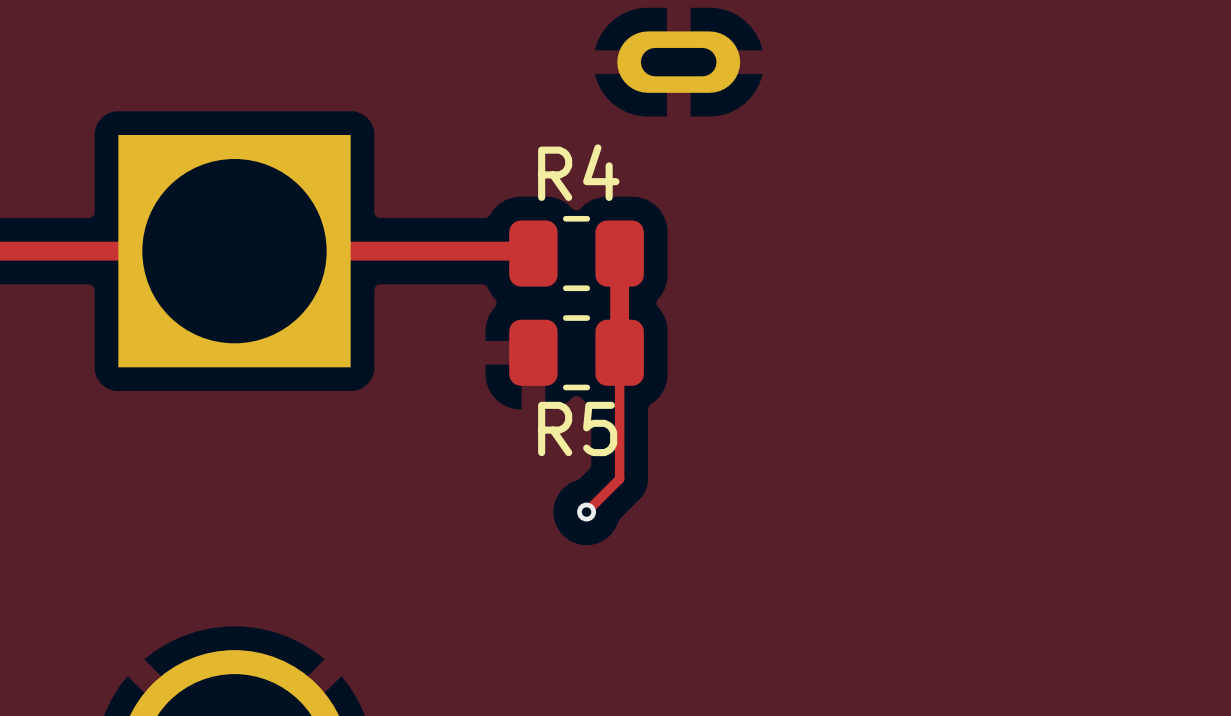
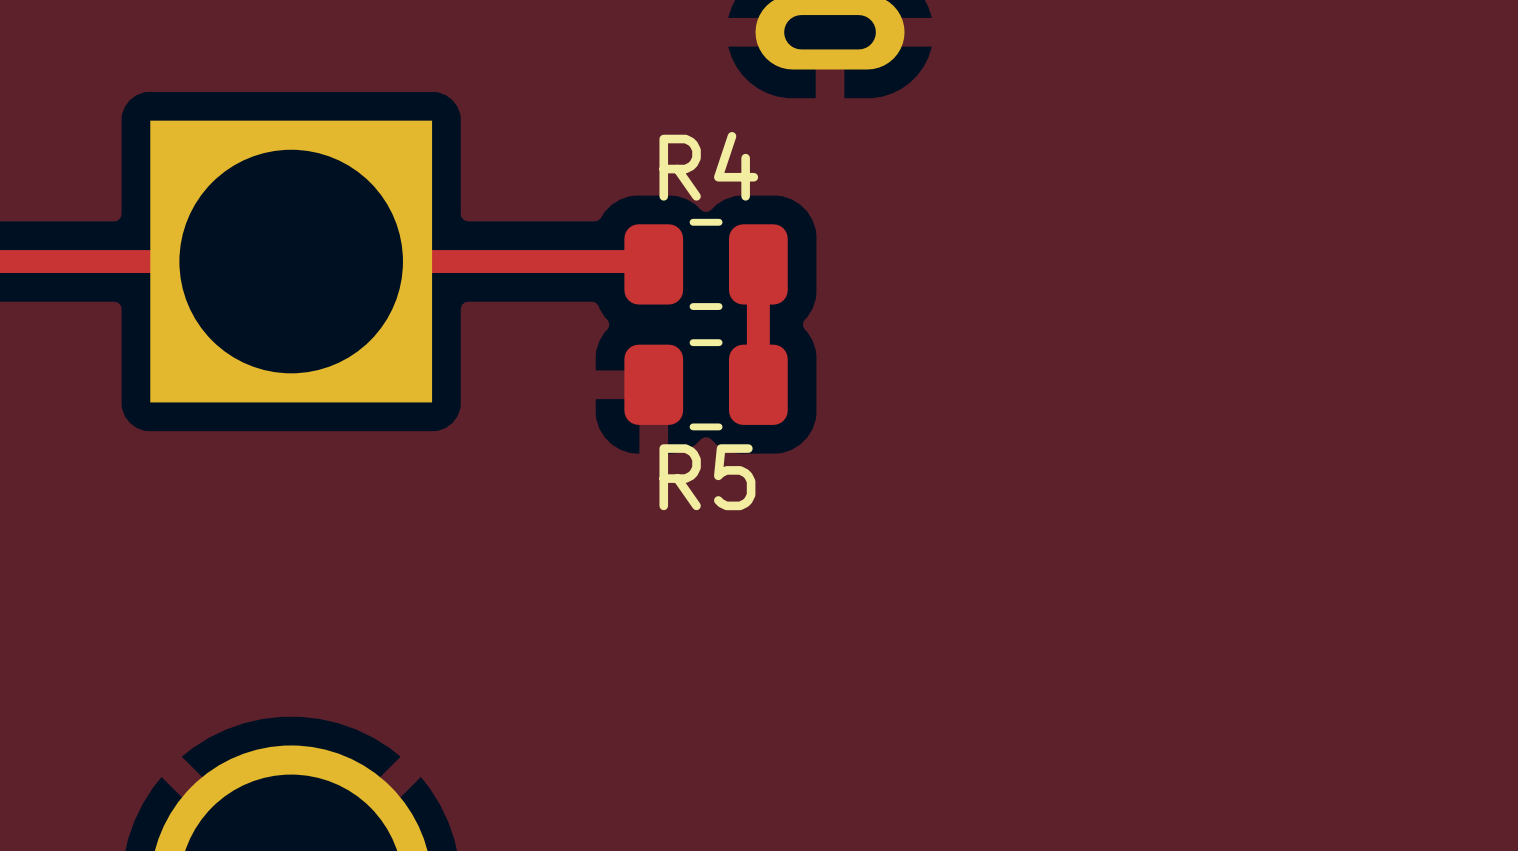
track: (619, 352) (619, 478) (586, 512) -> none
via: (586, 512) -> none

